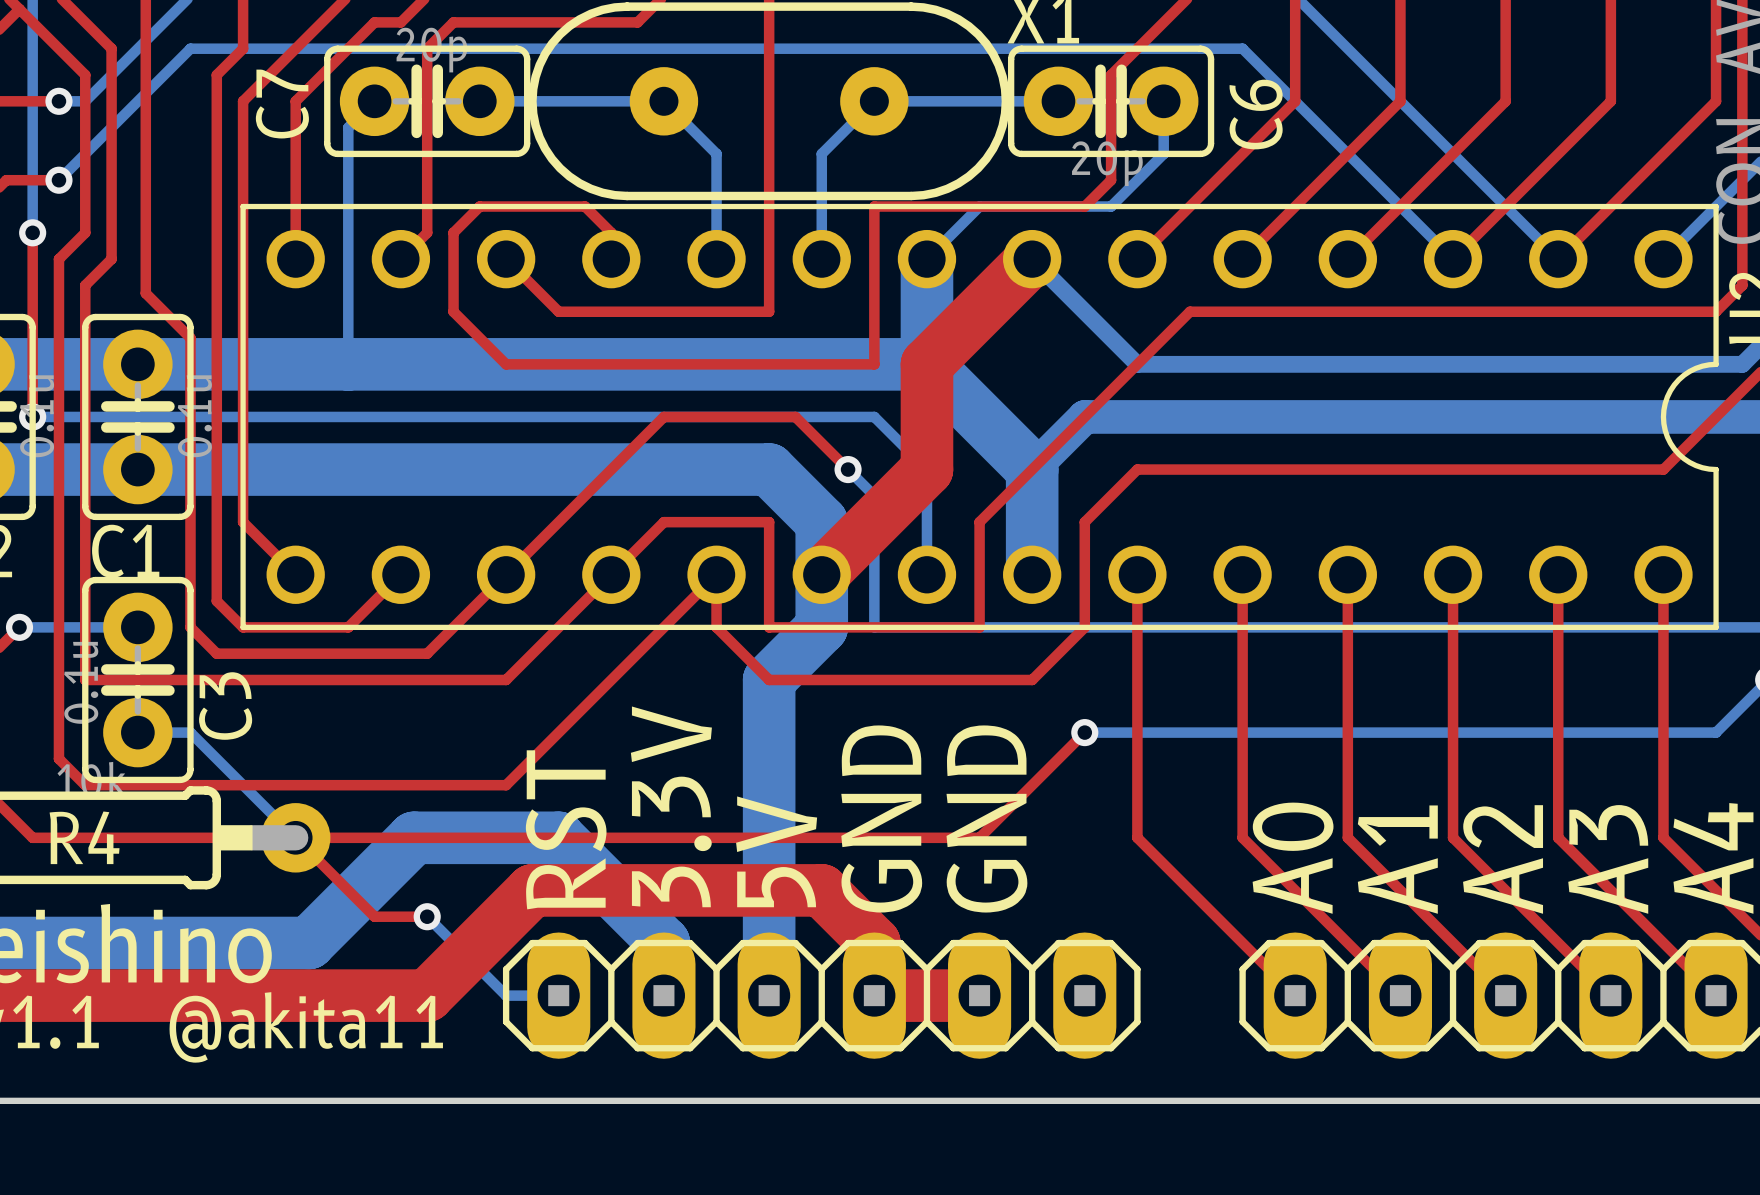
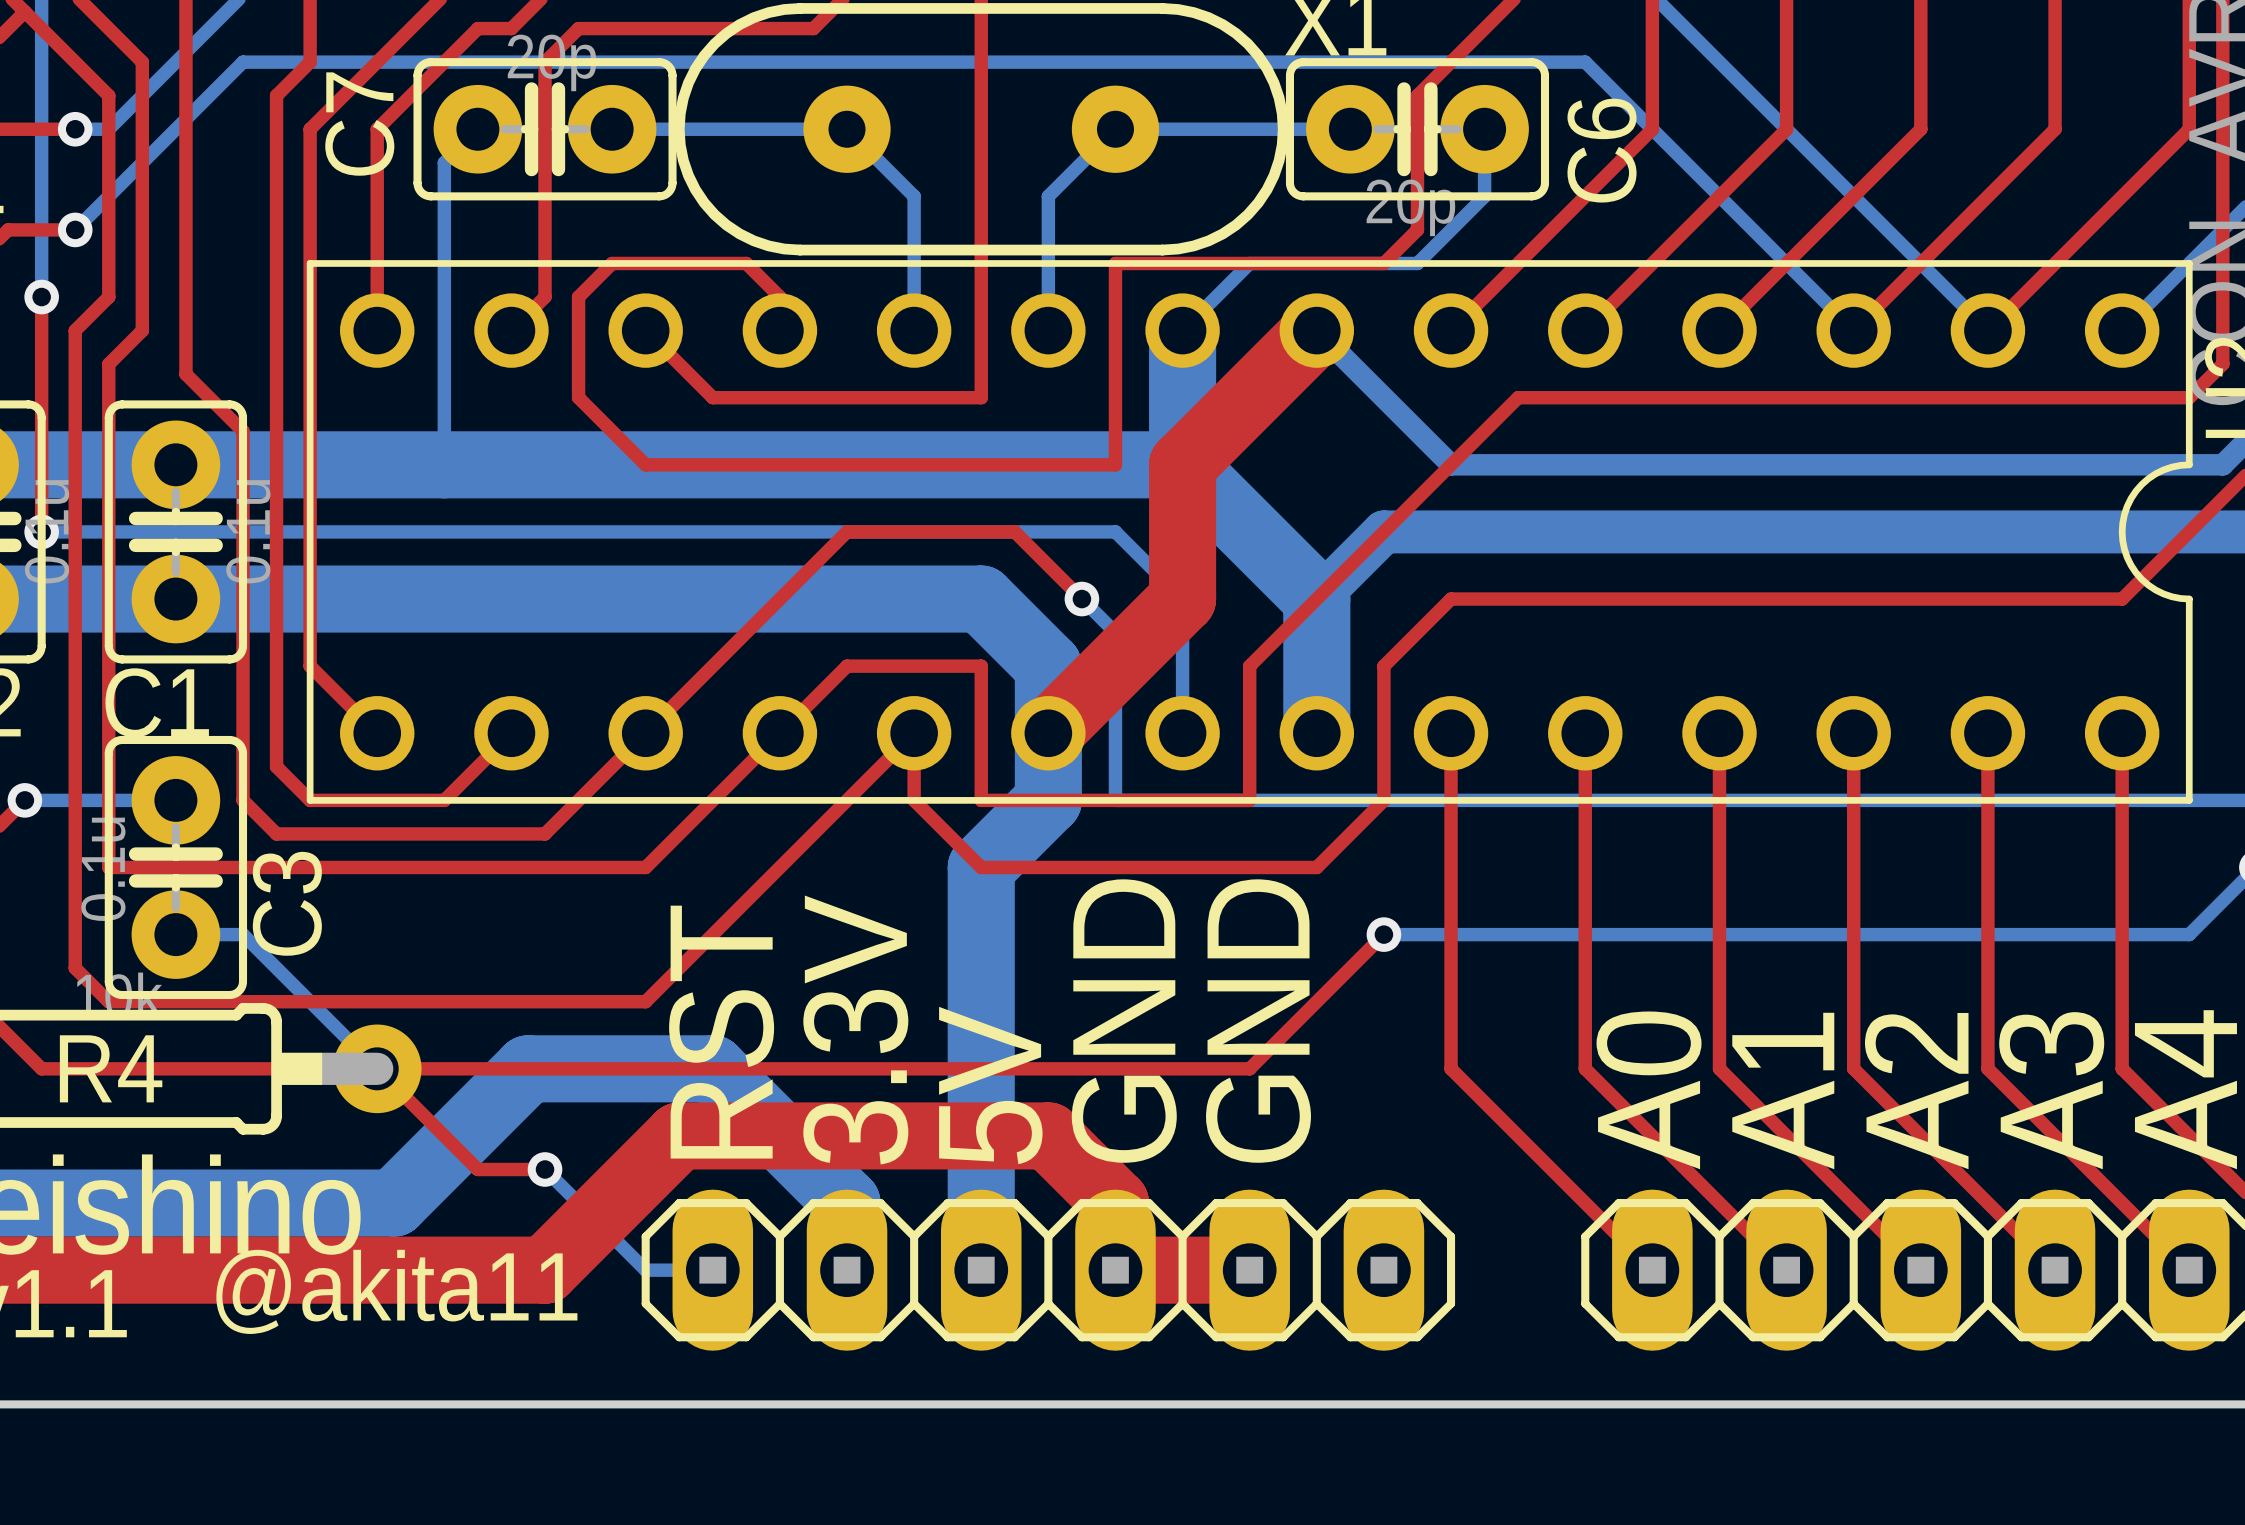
text position: @akita11 (306, 1027) -> @akita11 (396, 1291)

